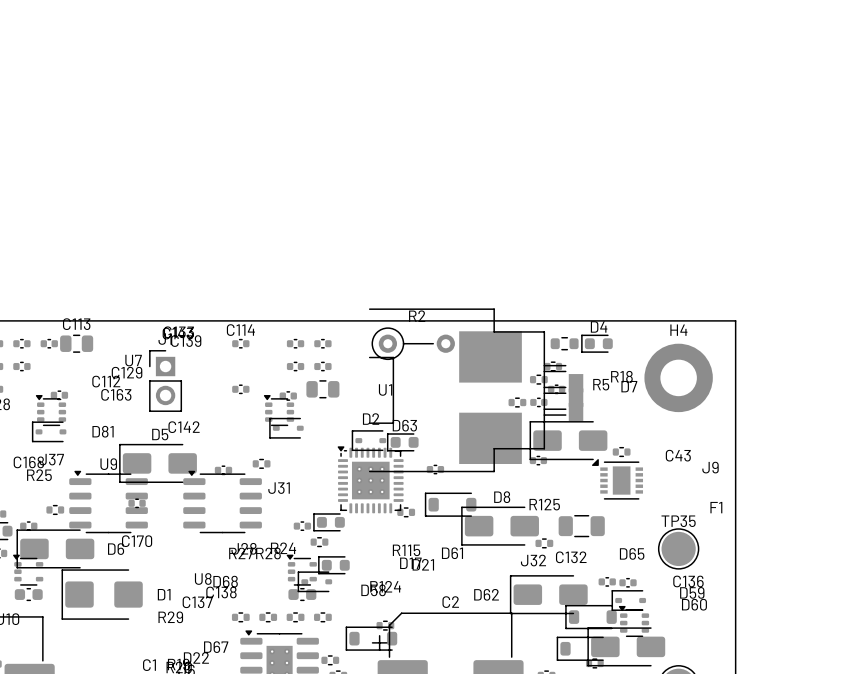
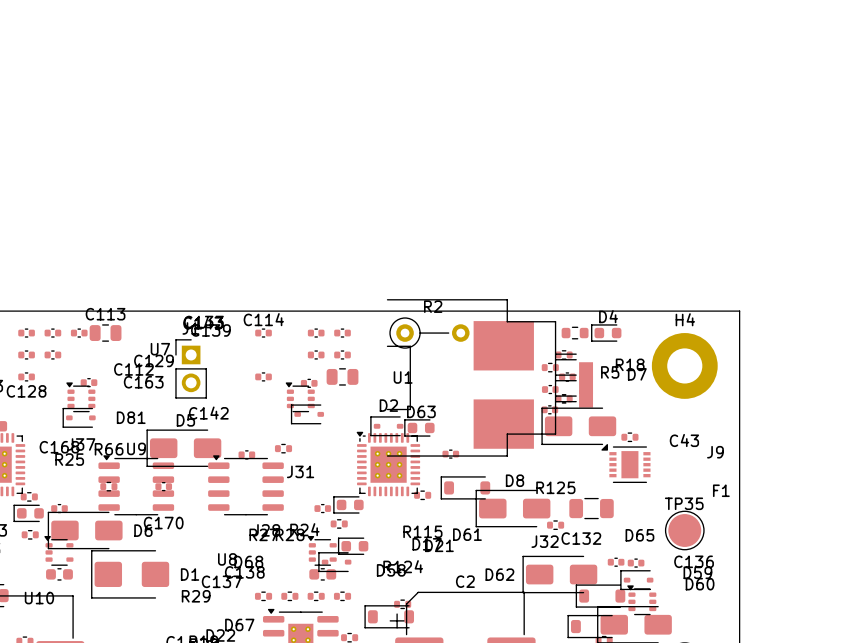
part position: (517, 402) -> (564, 398)
part position: (538, 460) -> (549, 409)
R66: none -> (108, 486)
part: (55, 509) -> none

